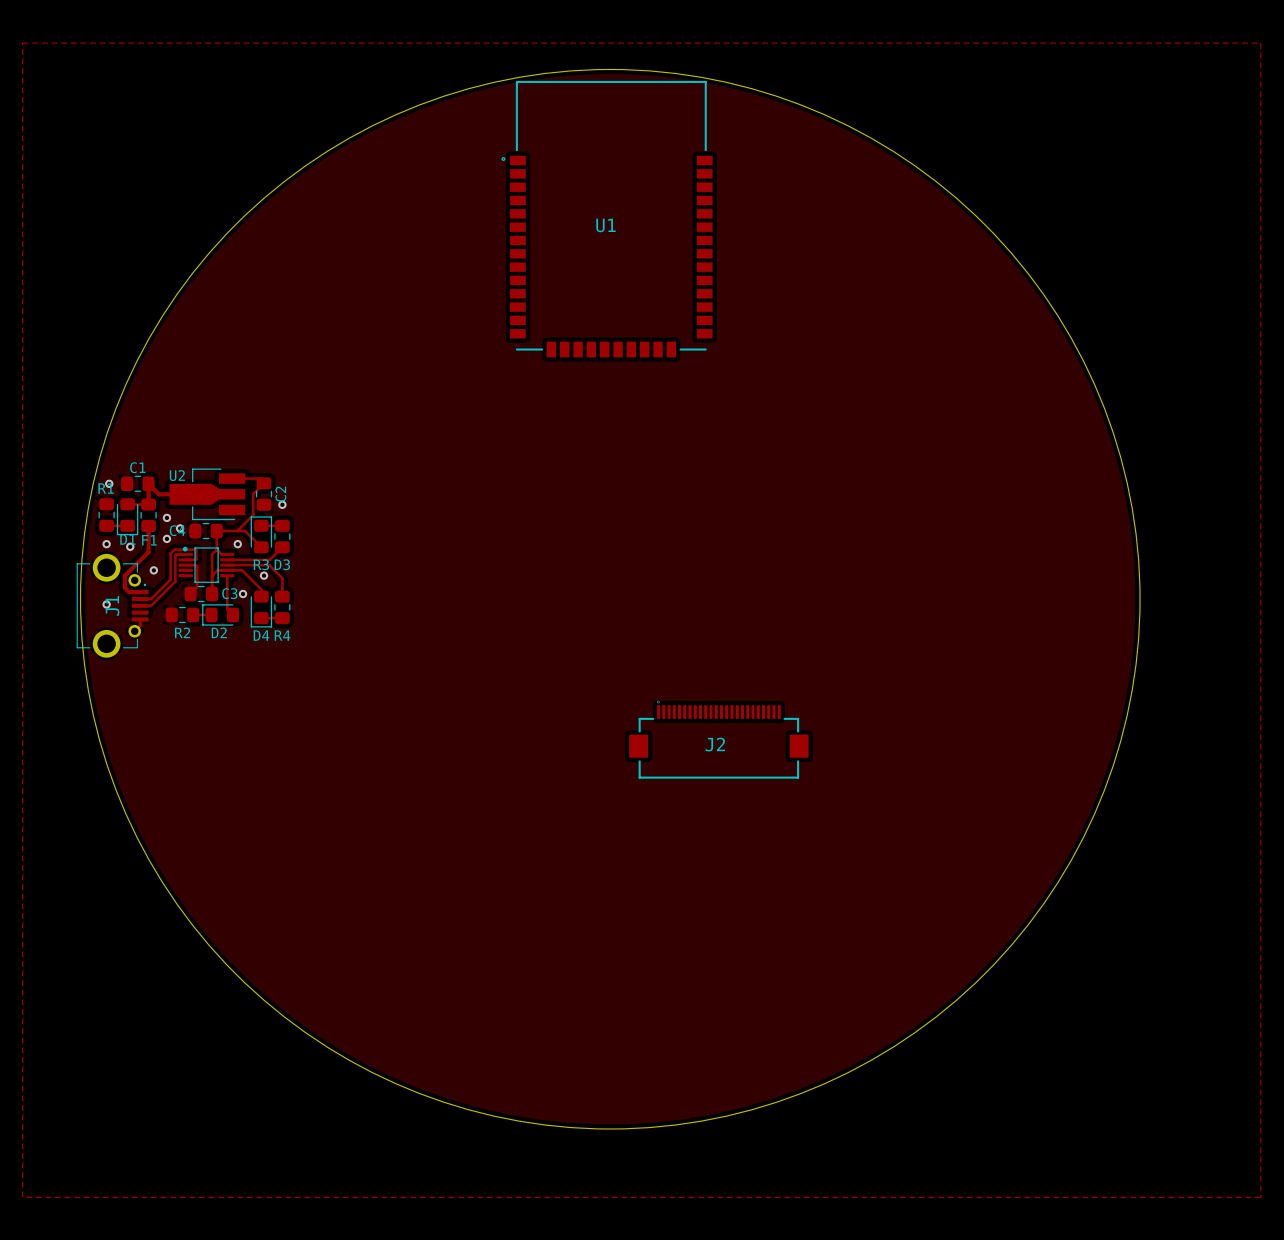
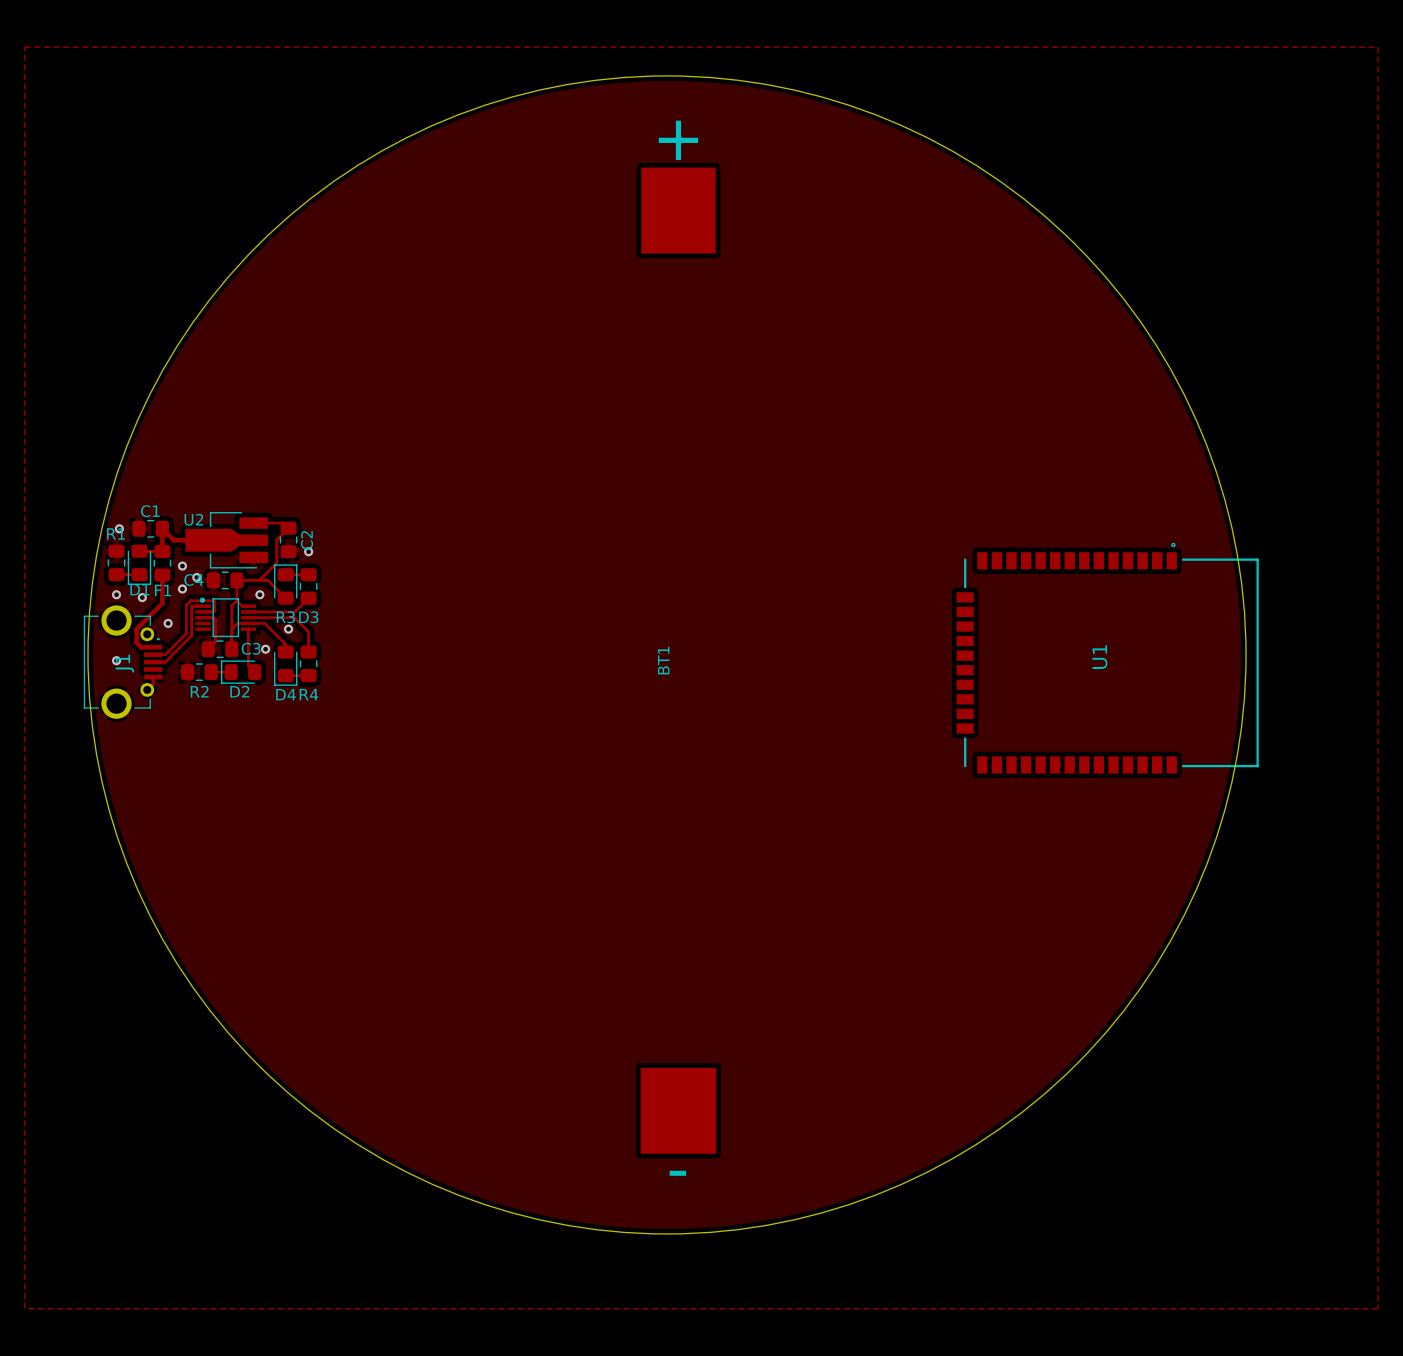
U1 rotation: 0° (607, 219) -> 90° clockwise (1107, 658)
U1 position: (607, 219) -> (1107, 658)
BT1: none -> (678, 660)
J2: (718, 739) -> none

